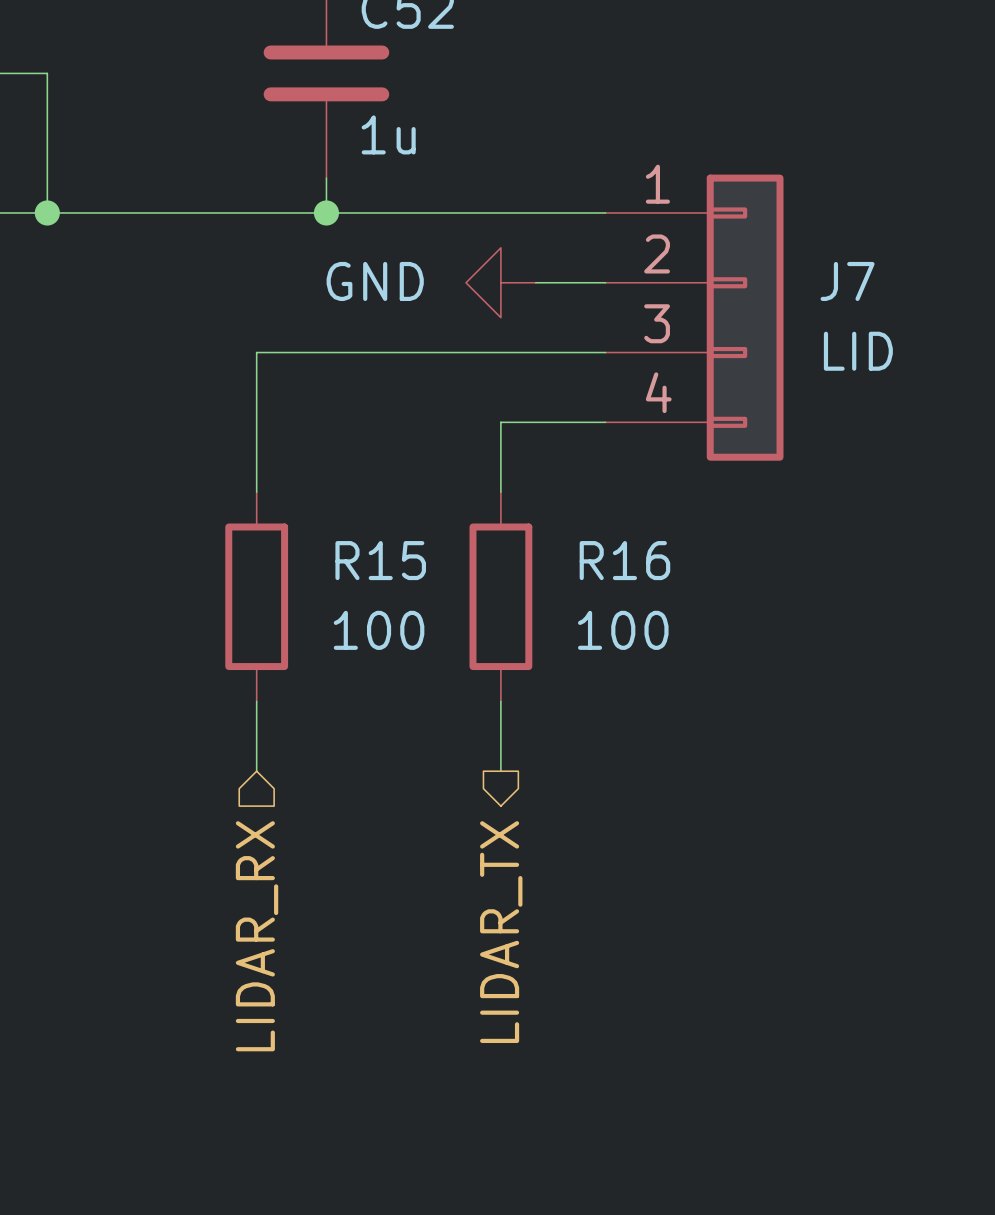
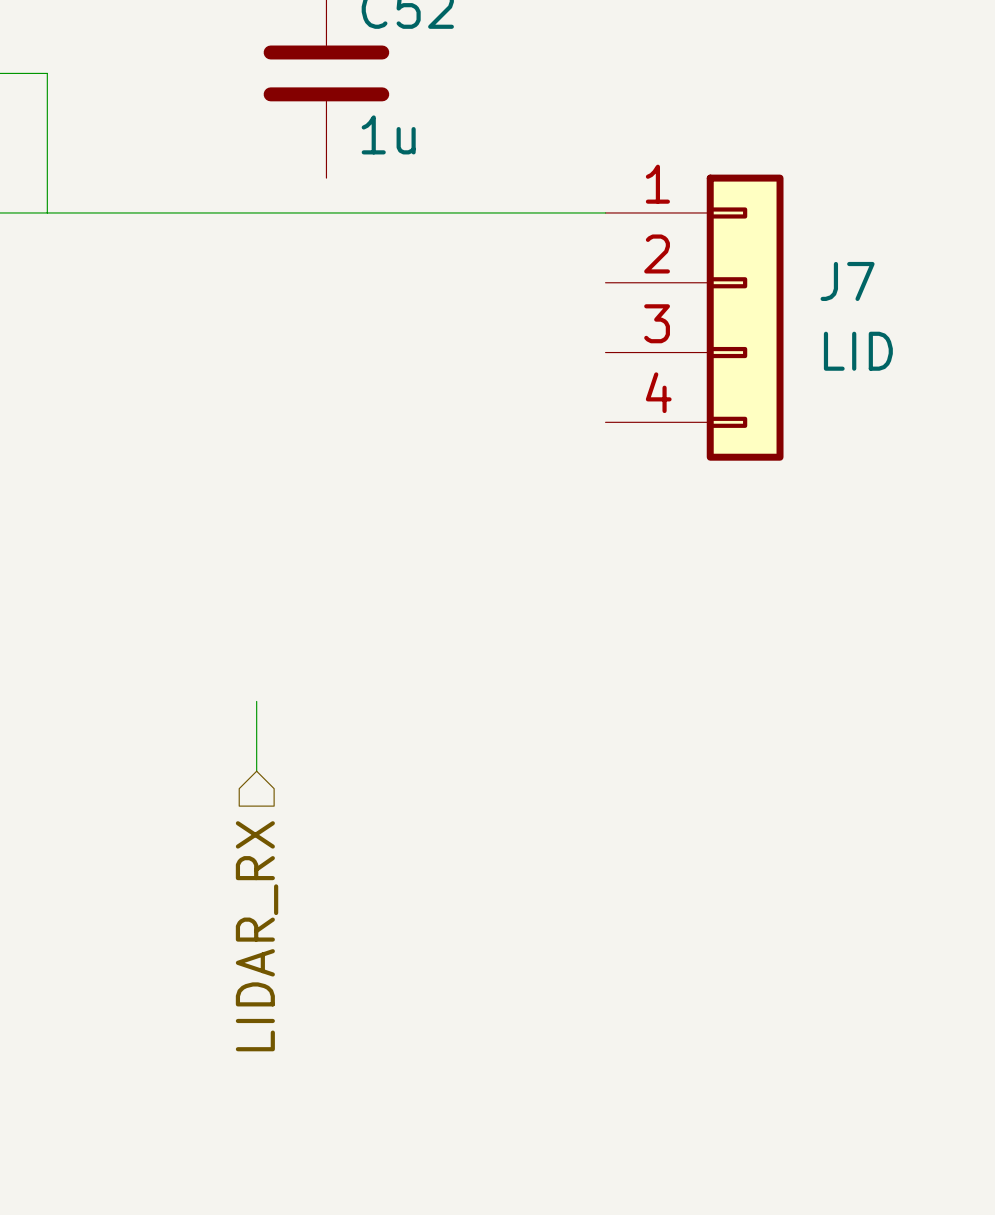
wire: (326, 178) (326, 212) -> none
junction: (47, 212) -> none
junction: (326, 212) -> none
power symbol: GND (500, 282) -> none
wire: (535, 282) (605, 282) -> none
wire: (605, 352) (256, 352) (256, 492) -> none
wire: (605, 422) (500, 422) (500, 492) -> none
R15: 100 (256, 596) -> none
R16: 100 (500, 596) -> none
wire: (500, 701) (500, 771) -> none
hierarchical label: LIDAR_TX (501, 932) -> none

